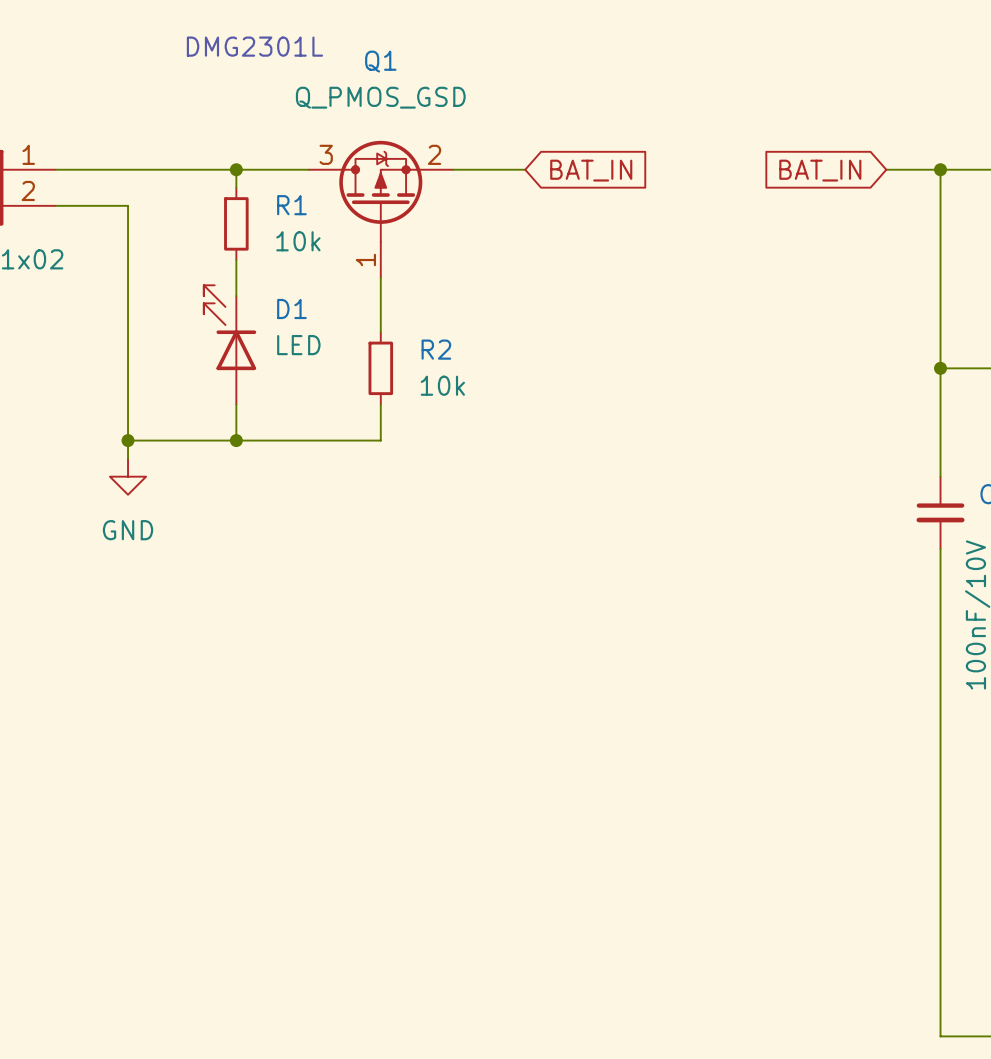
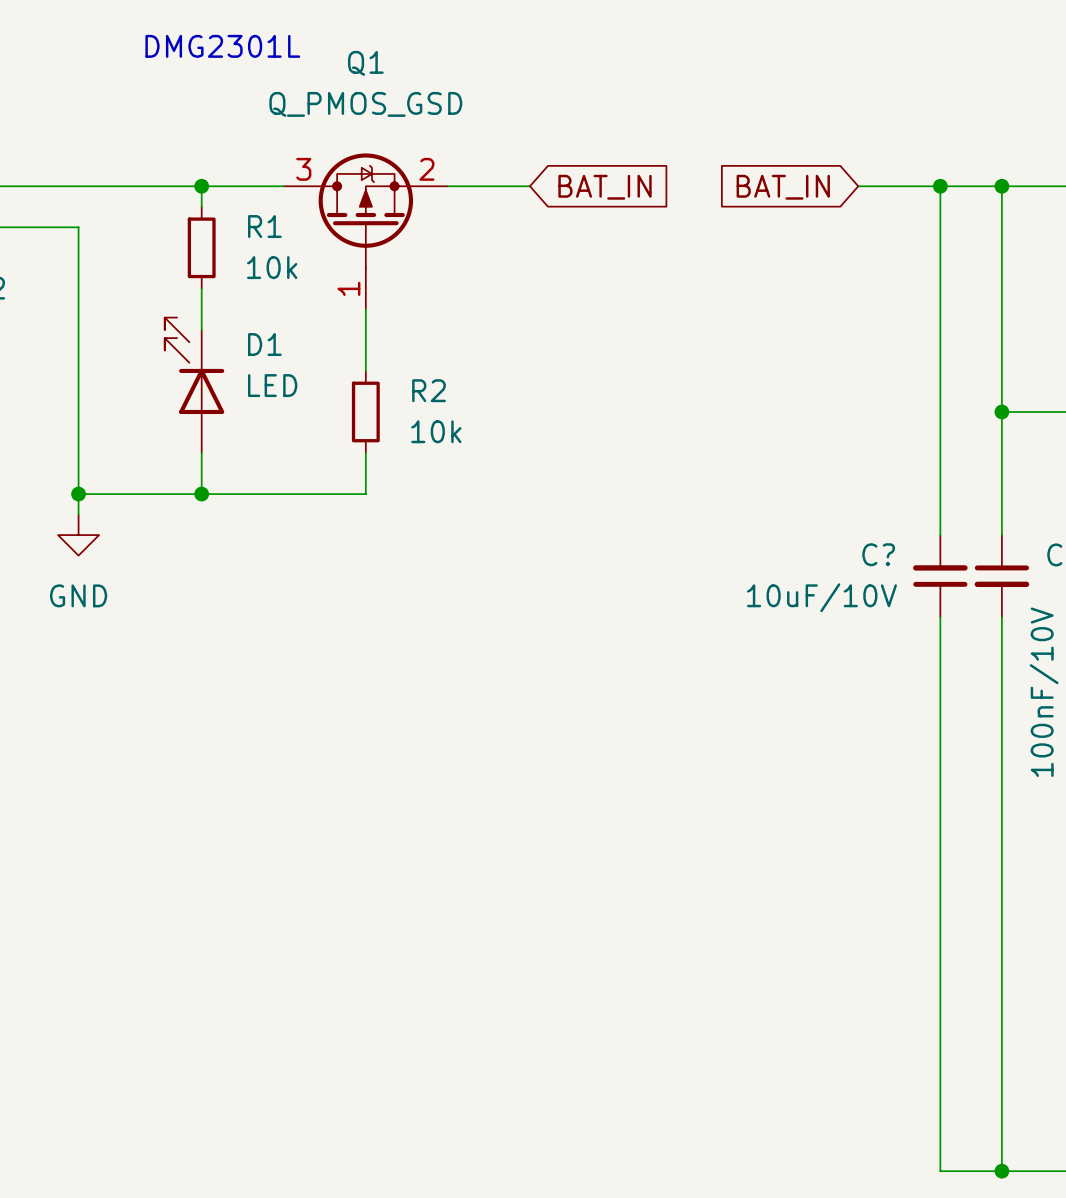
wire: none -> (858, 186) (940, 186) (940, 535)
junction: none -> (940, 186)
global label position: BAT_IN (820, 170) -> BAT_IN (783, 187)
C?: none -> 10uF/10V (940, 576)
wire: none -> (940, 617) (940, 1171) (1001, 1171)
junction: none -> (1001, 1171)

